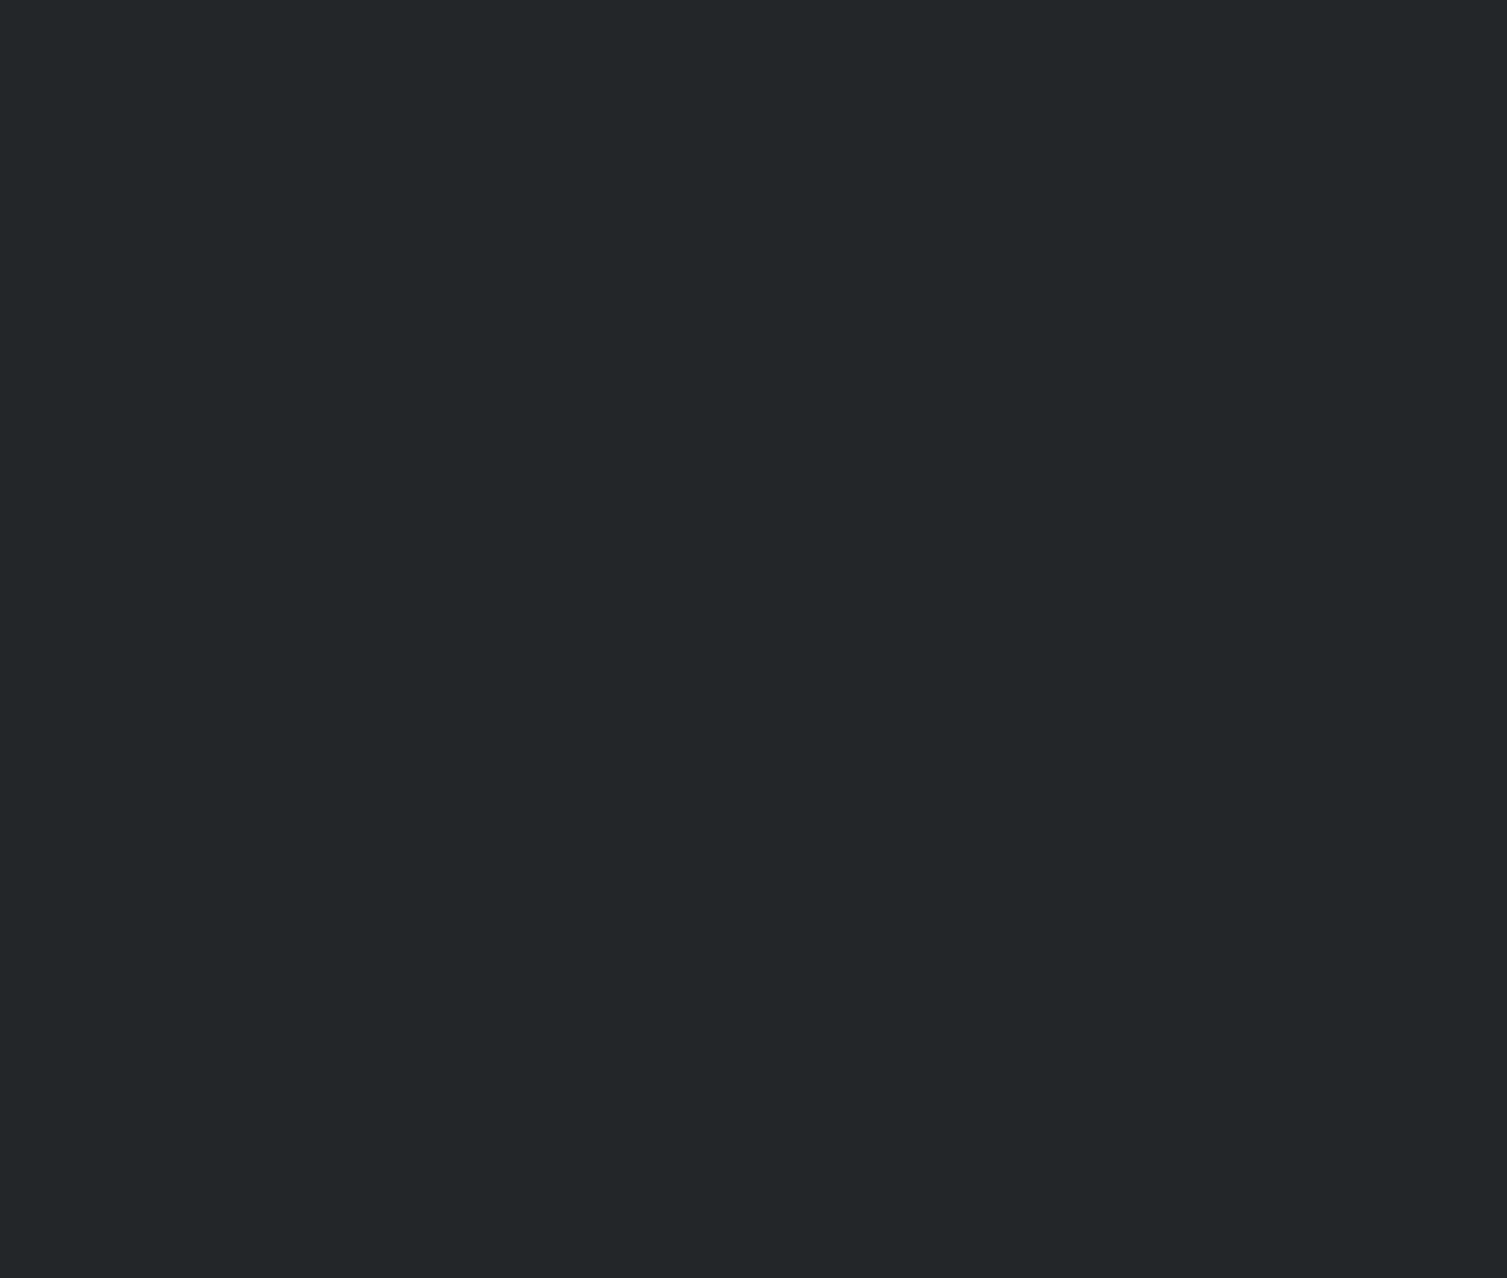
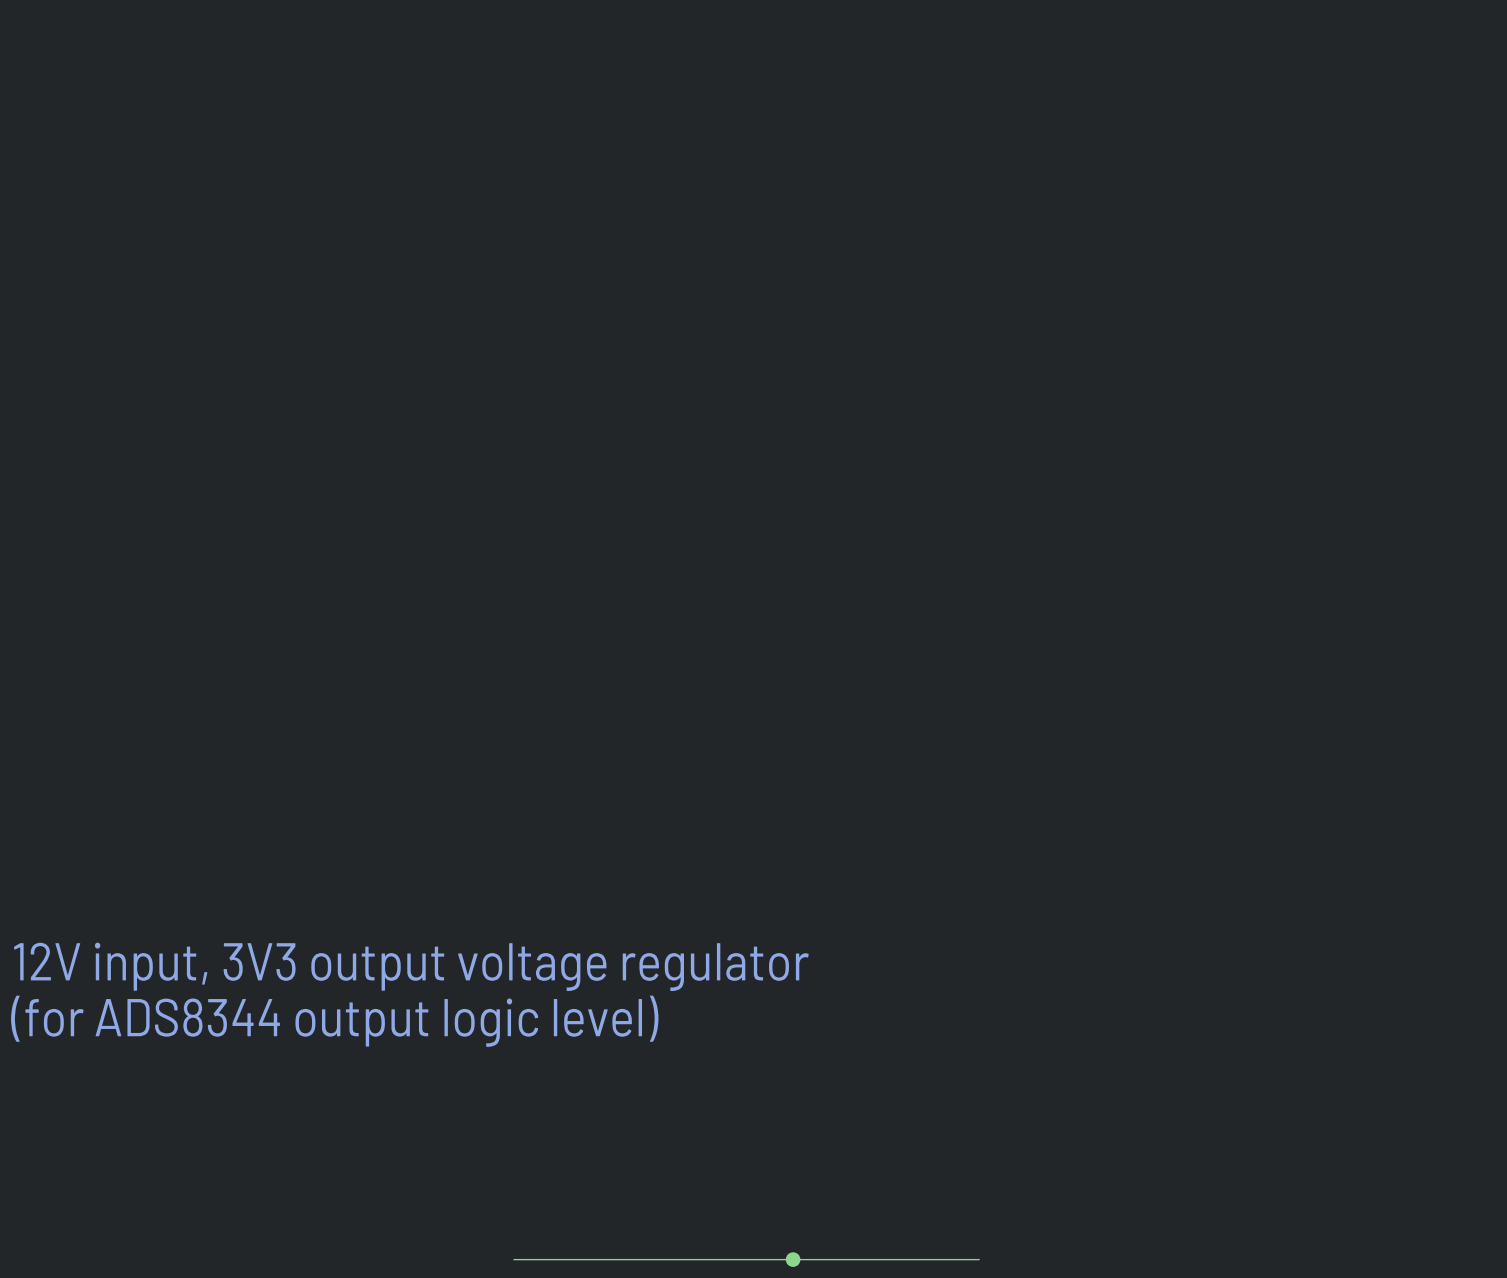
text: none -> 12V input, 3V3 output voltage regulator (411, 966)
text: none -> (for ADS8344 output logic level) (334, 1021)
wire: none -> (513, 1259) (979, 1259)
junction: none -> (793, 1259)

